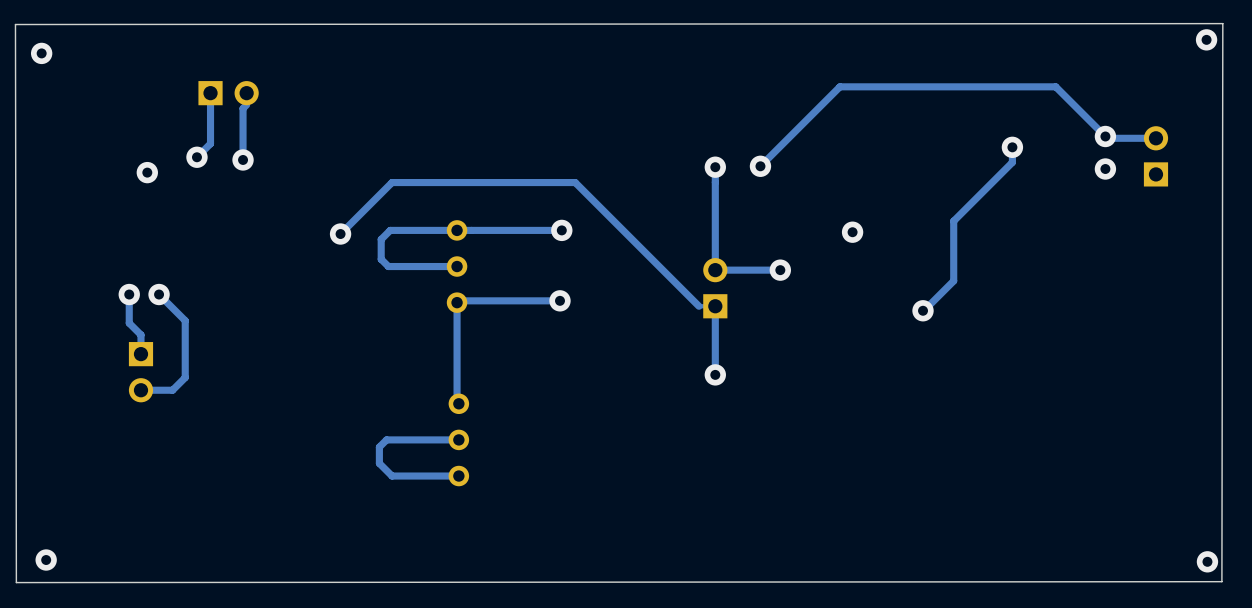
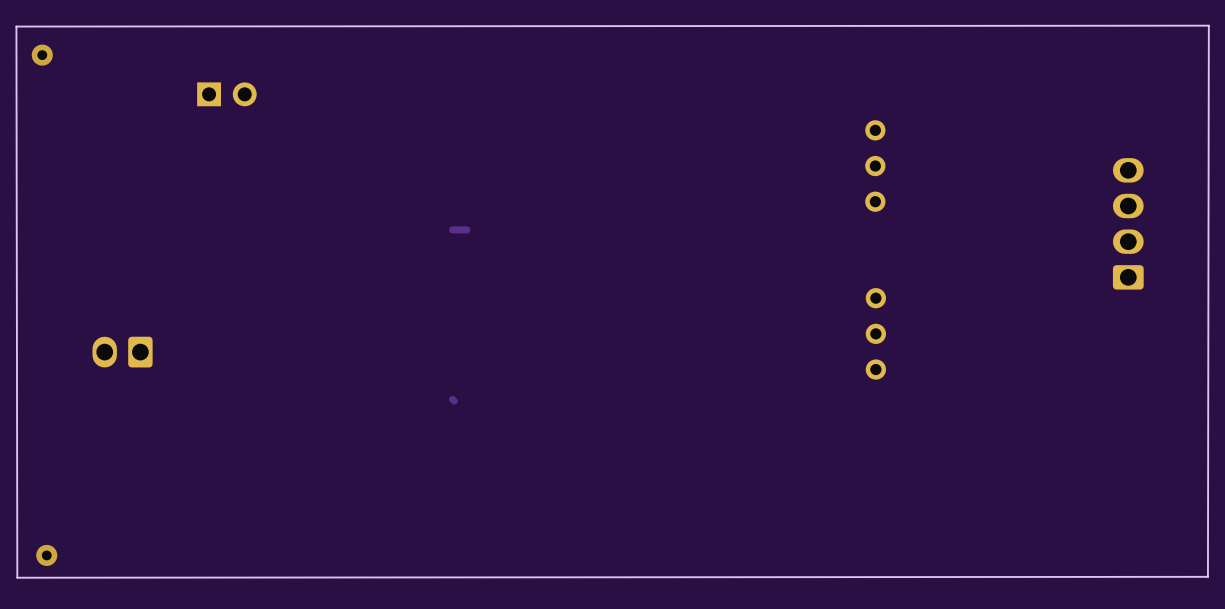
via: (1206, 39) -> none
track: (210, 104) (210, 143) (196, 157) -> none
track: (246, 104) (243, 108) (243, 159) -> none
via: (1105, 136) -> none
track: (1155, 138) (1107, 138) (1055, 86) (839, 86) (760, 166) -> none
track: (1012, 147) (1012, 162) (953, 221) (953, 280) (923, 311) -> none
via: (1012, 147) -> none
part: (1155, 156) -> none
via: (196, 157) -> none
via: (243, 159) -> none
part: none -> (875, 166)
via: (760, 166) -> none
track: (715, 167) (715, 270) (780, 270) -> none
via: (715, 167) -> none
via: (1105, 169) -> none
via: (147, 172) -> none
part: none -> (1128, 223)
track: (457, 230) (390, 230) (381, 239) (381, 259) (388, 266) (457, 266) -> none
track: (561, 230) (471, 230) -> none
via: (561, 230) -> none
via: (852, 232) -> none
track: (340, 234) (392, 182) (575, 182) (698, 306) (715, 306) (715, 374) -> none
via: (340, 234) -> none
part: (457, 266) -> none
via: (780, 270) -> none
part: (715, 288) -> none
track: (129, 294) (129, 323) (140, 334) (140, 354) -> none
via: (129, 294) -> none
track: (159, 294) (185, 320) (185, 377) (172, 390) (140, 390) -> none
via: (159, 294) -> none
track: (559, 300) (458, 300) (457, 302) (457, 401) -> none
via: (559, 300) -> none
via: (923, 310) -> none
part: none -> (875, 333)
part: none -> (122, 352)
part: (140, 372) -> none
via: (715, 374) -> none
track: (458, 439) (386, 439) (379, 447) (379, 463) (392, 476) (458, 476) -> none
part: (458, 439) -> none
via: (1207, 561) -> none

